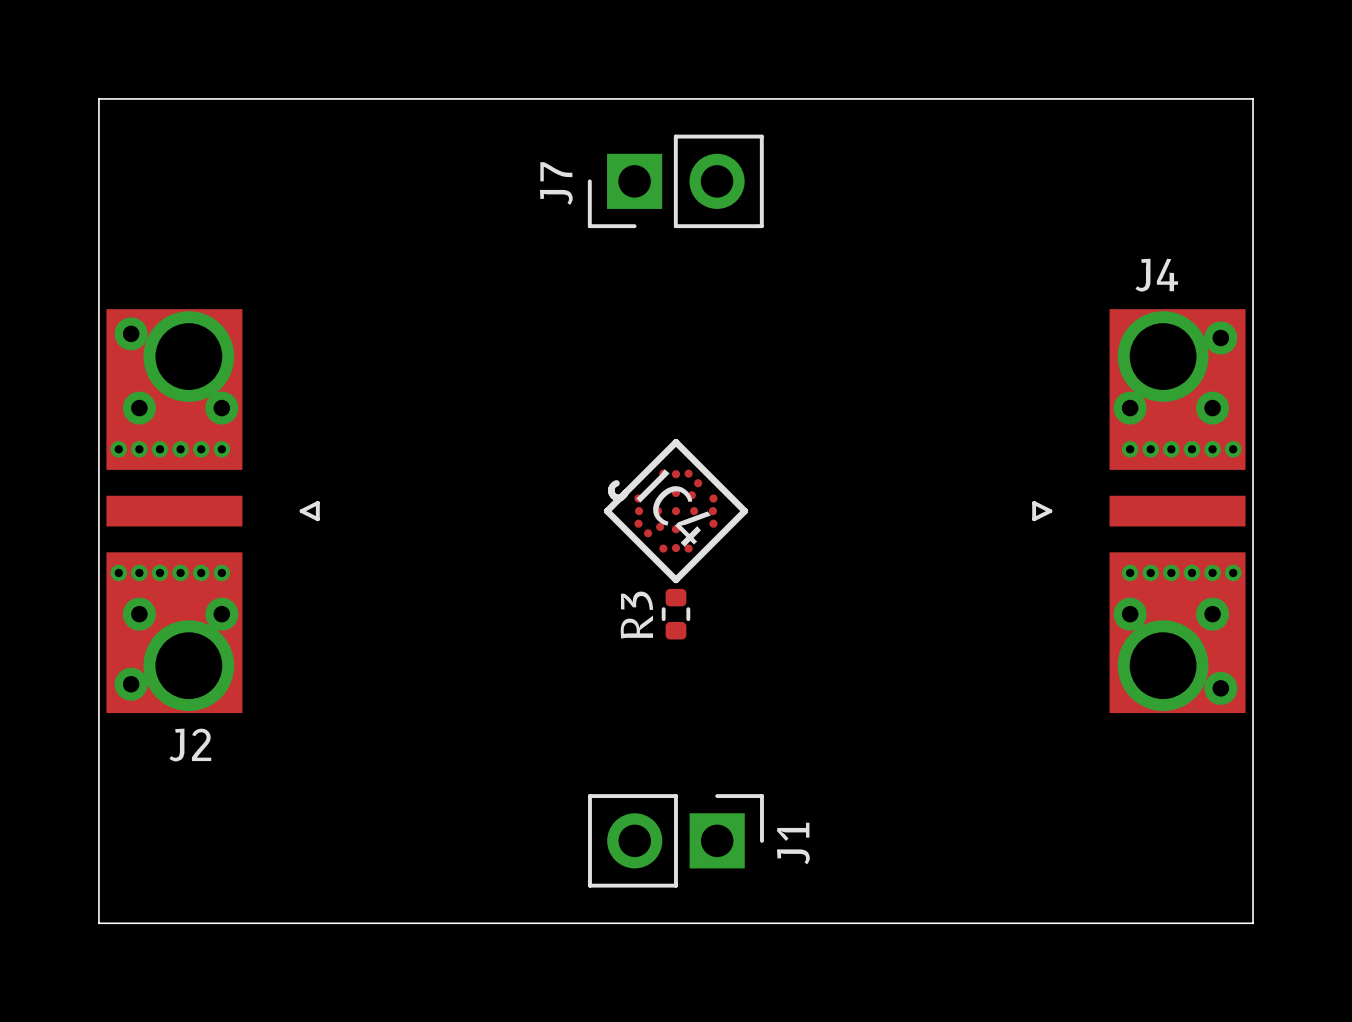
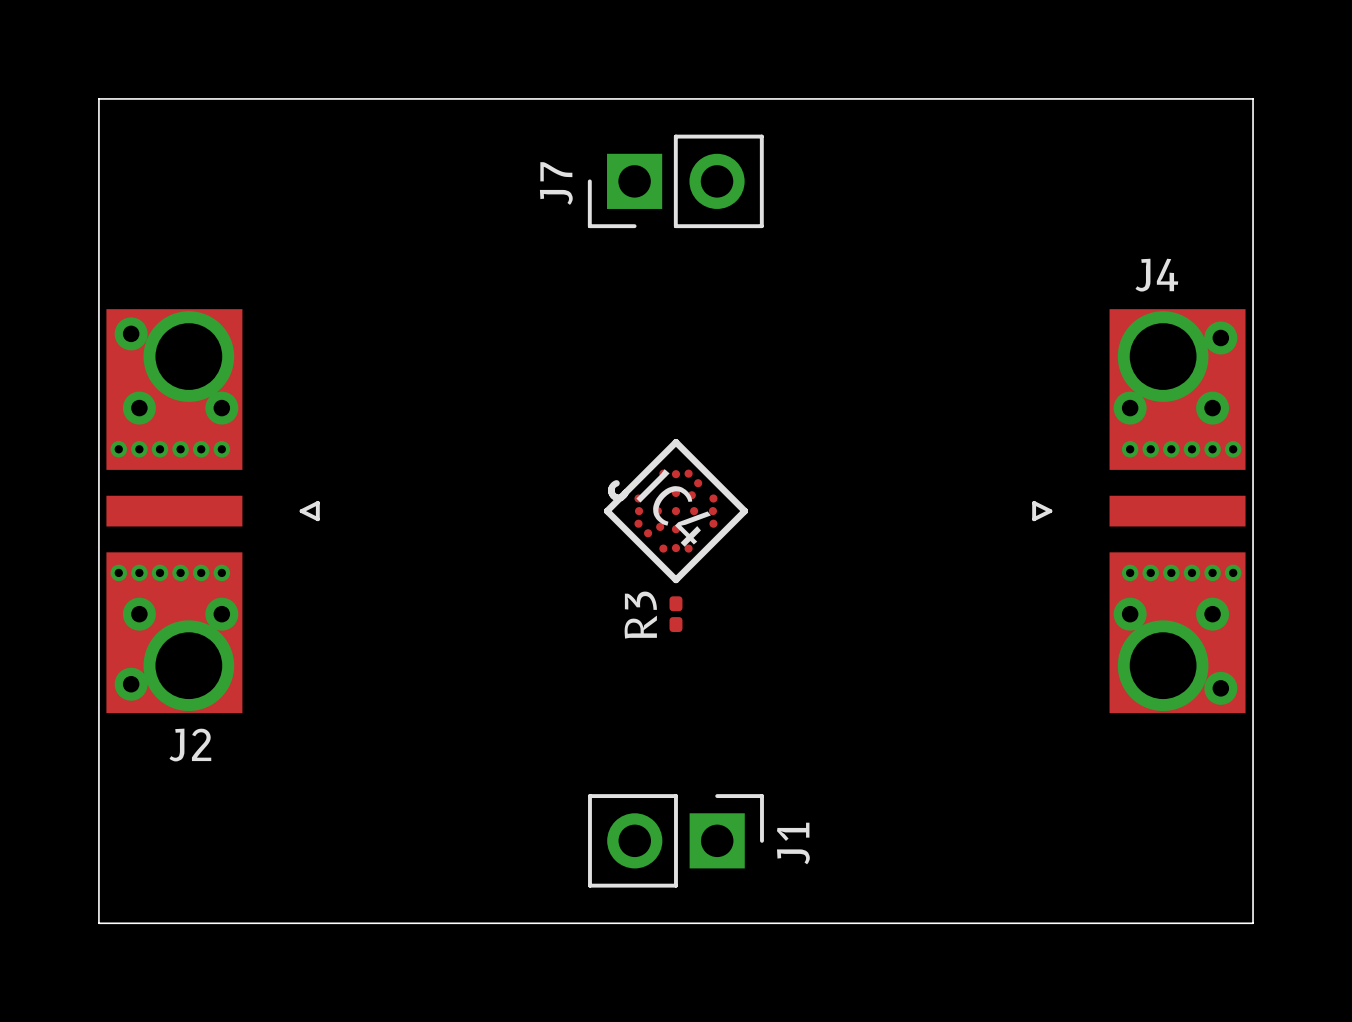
R3 footprint: [661, 588, 691, 640] -> [669, 596, 683, 633]

